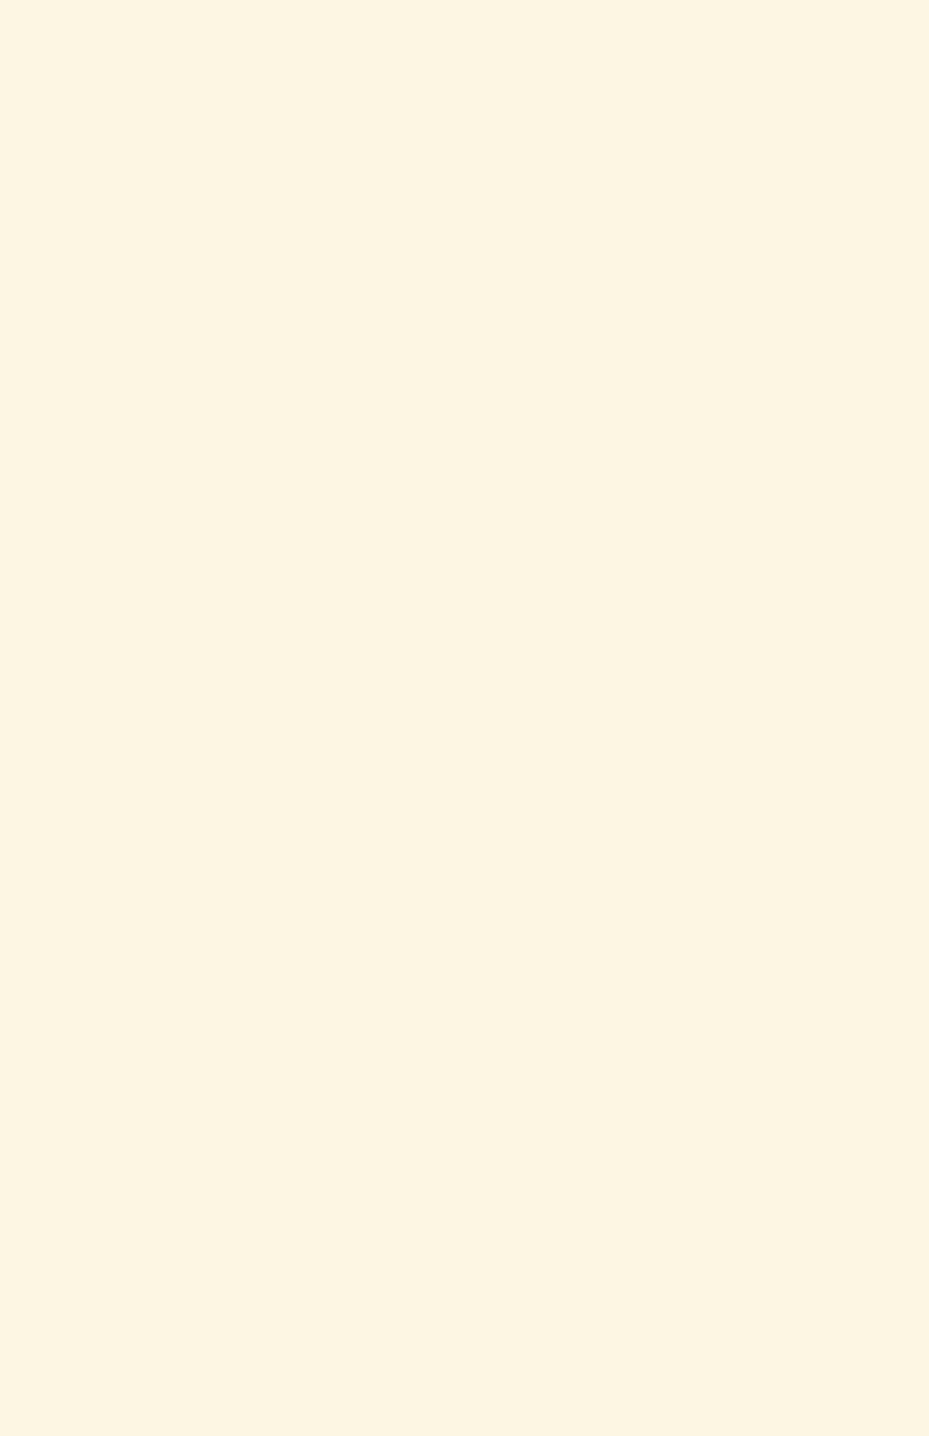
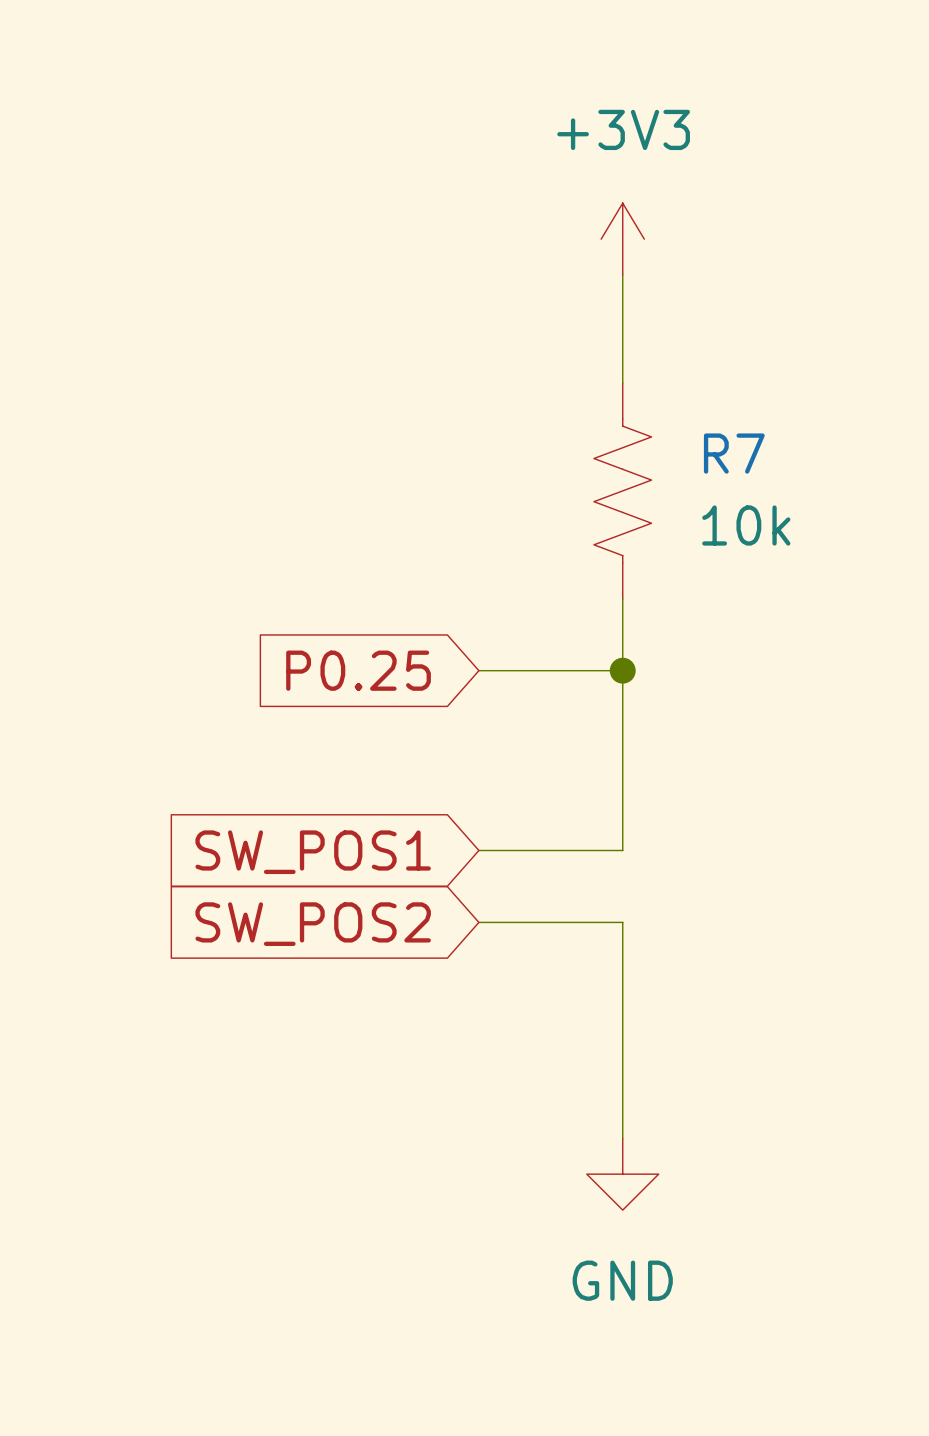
power symbol: none -> +3V3 (622, 239)
wire: none -> (622, 275) (622, 383)
R7: none -> 10k (622, 490)
wire: none -> (622, 598) (622, 850) (478, 850)
global label: none -> P0.25 (358, 670)
wire: none -> (478, 670) (622, 670)
junction: none -> (622, 670)
global label: none -> SW_POS1 (313, 852)
wire: none -> (478, 922) (622, 922) (622, 1138)
global label: none -> SW_POS2 (313, 924)
power symbol: none -> GND (622, 1174)

